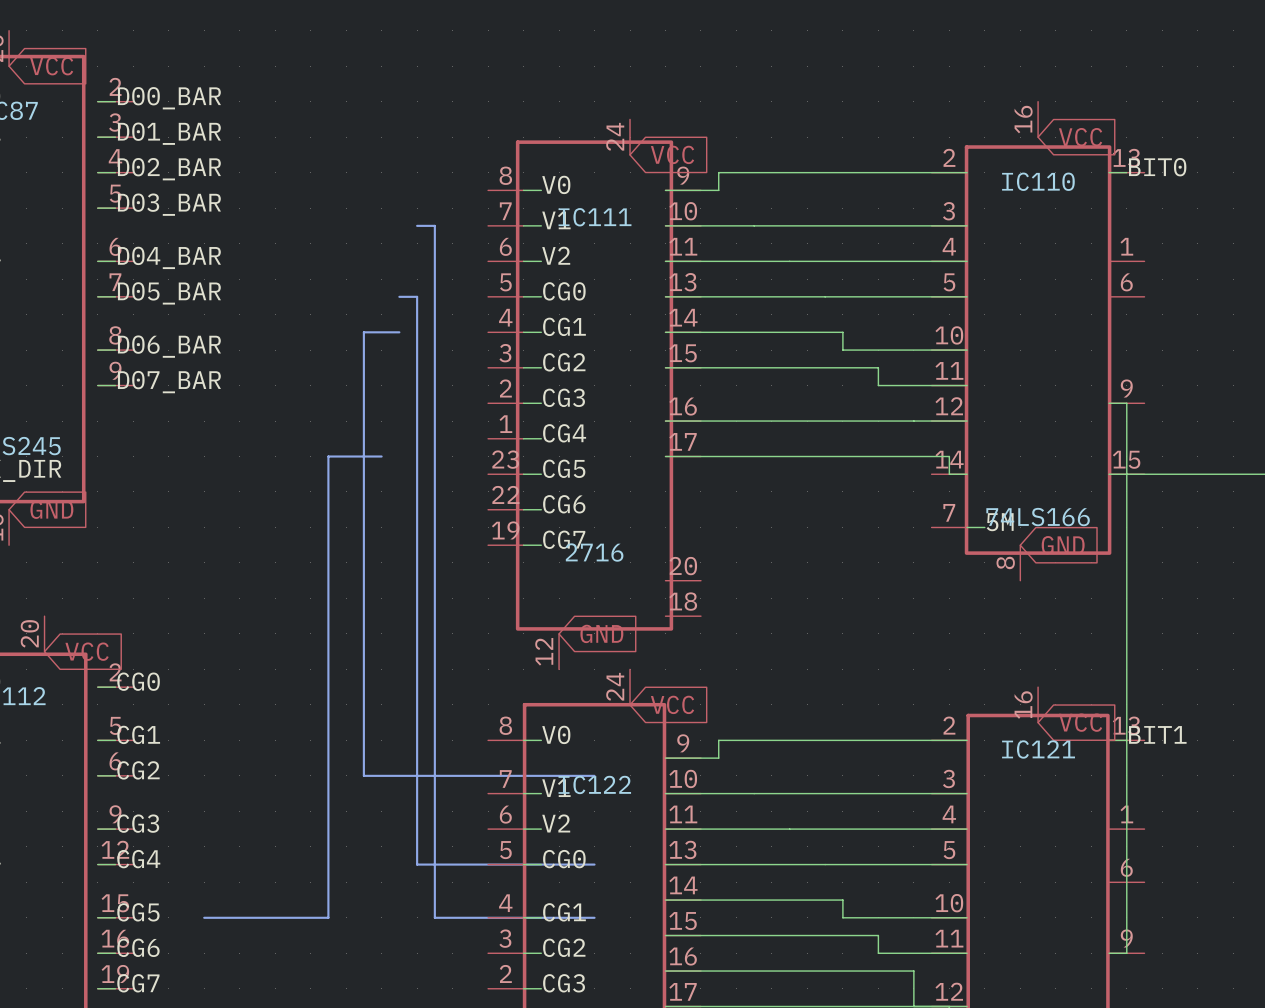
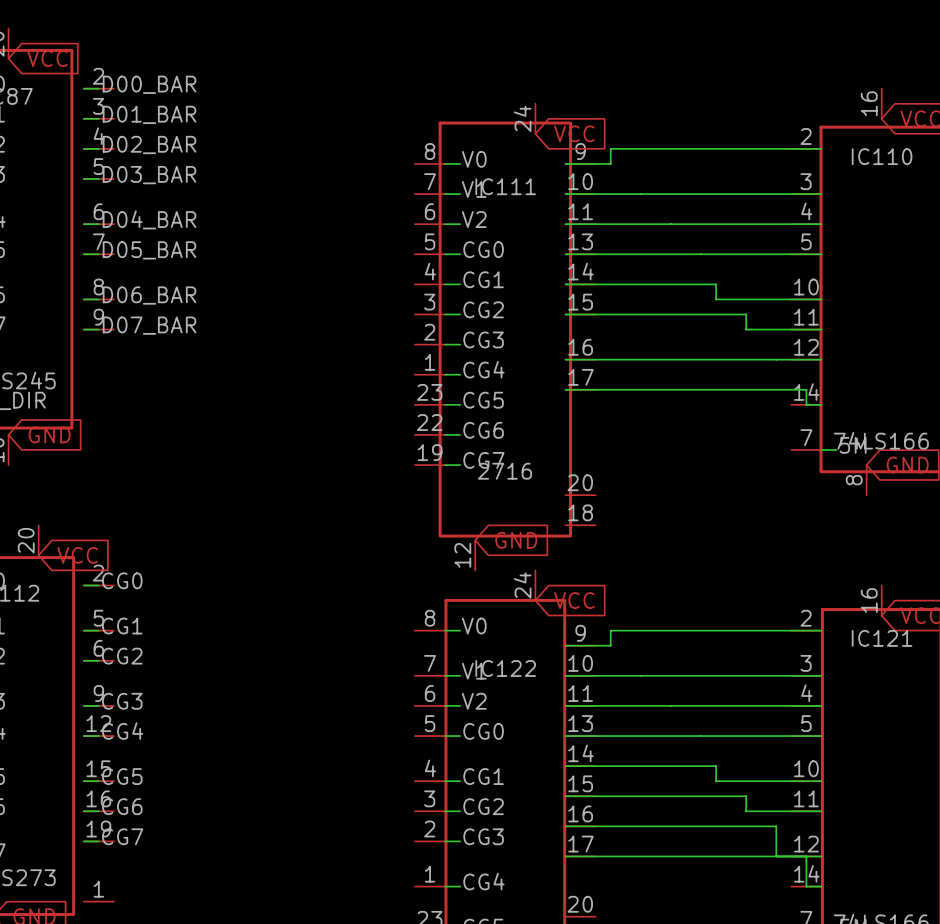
line: (417, 225) (434, 225) (434, 917) (594, 917) -> none
line: (399, 296) (417, 296) (417, 864) (594, 864) -> none
line: (399, 332) (363, 332) (363, 775) (594, 775) -> none
line: (381, 456) (328, 456) (328, 917) (204, 917) -> none

